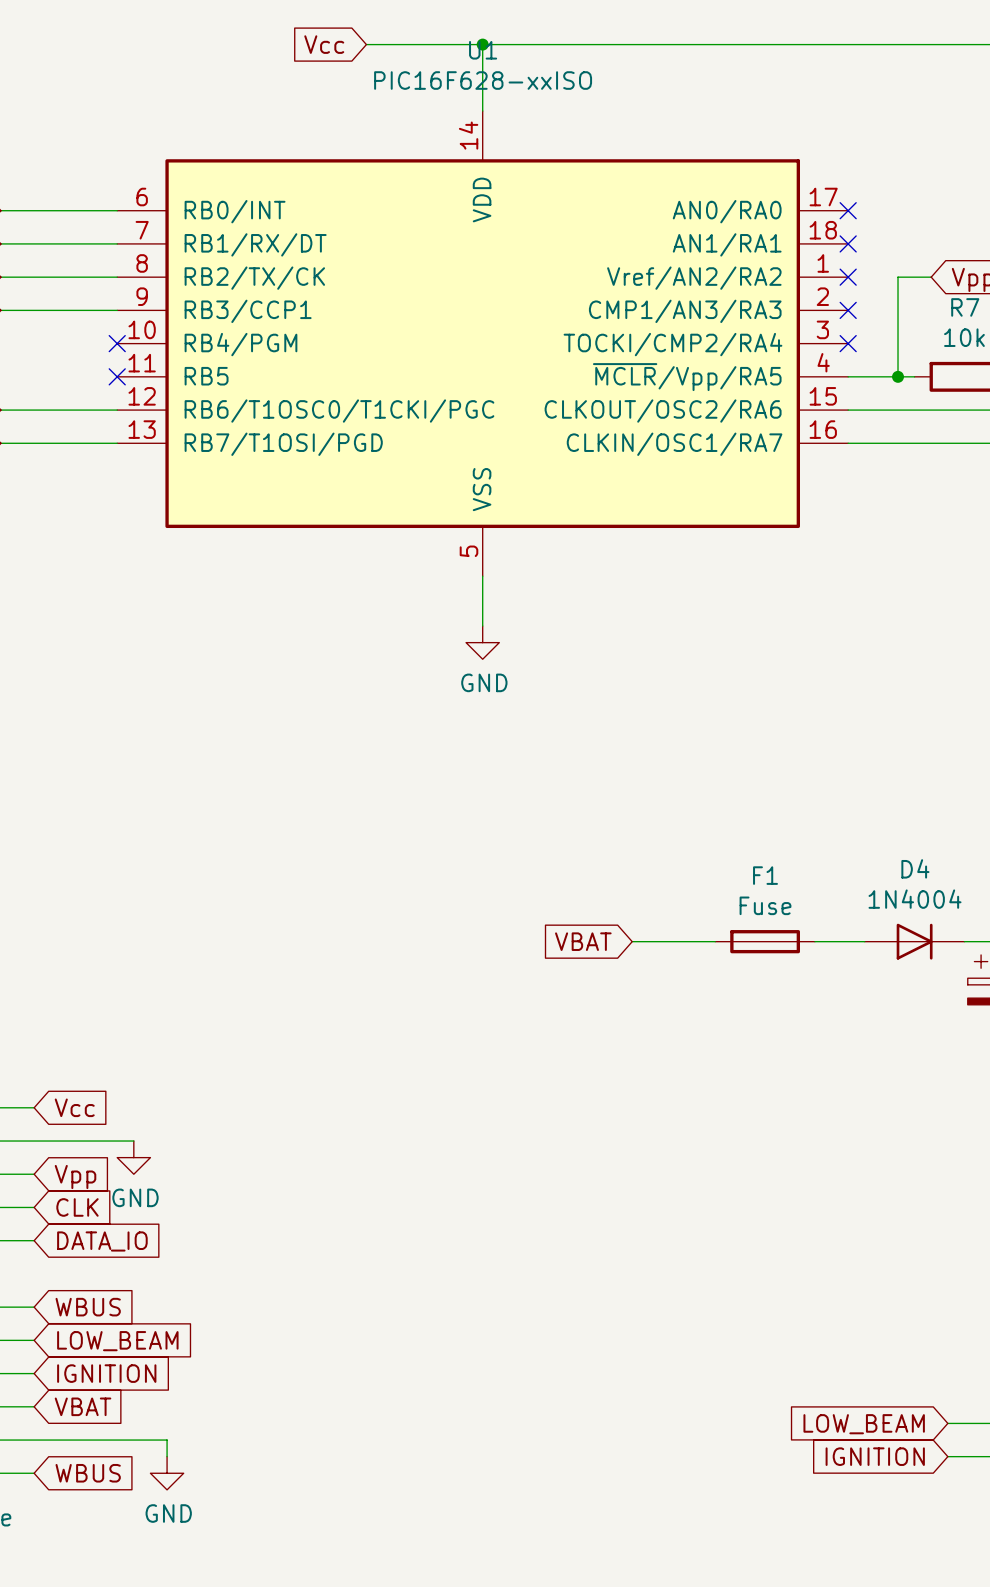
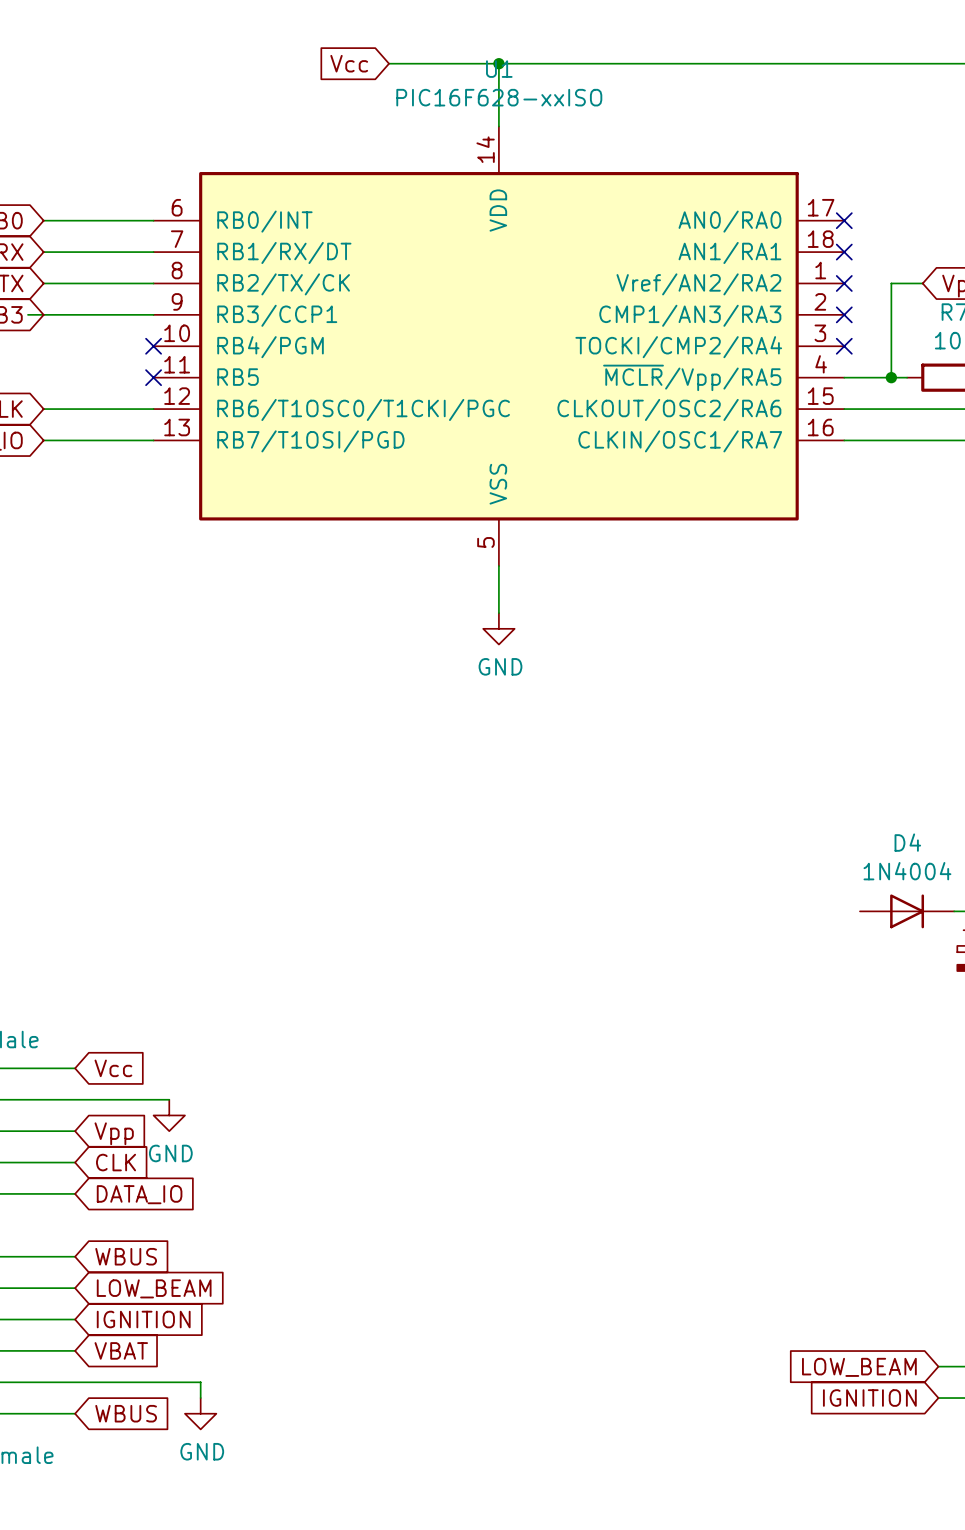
global label: VBAT (583, 941) -> none
wire: (632, 941) (715, 941) -> none
F1: Fuse (765, 941) -> none
wire: (814, 941) (864, 941) -> none

